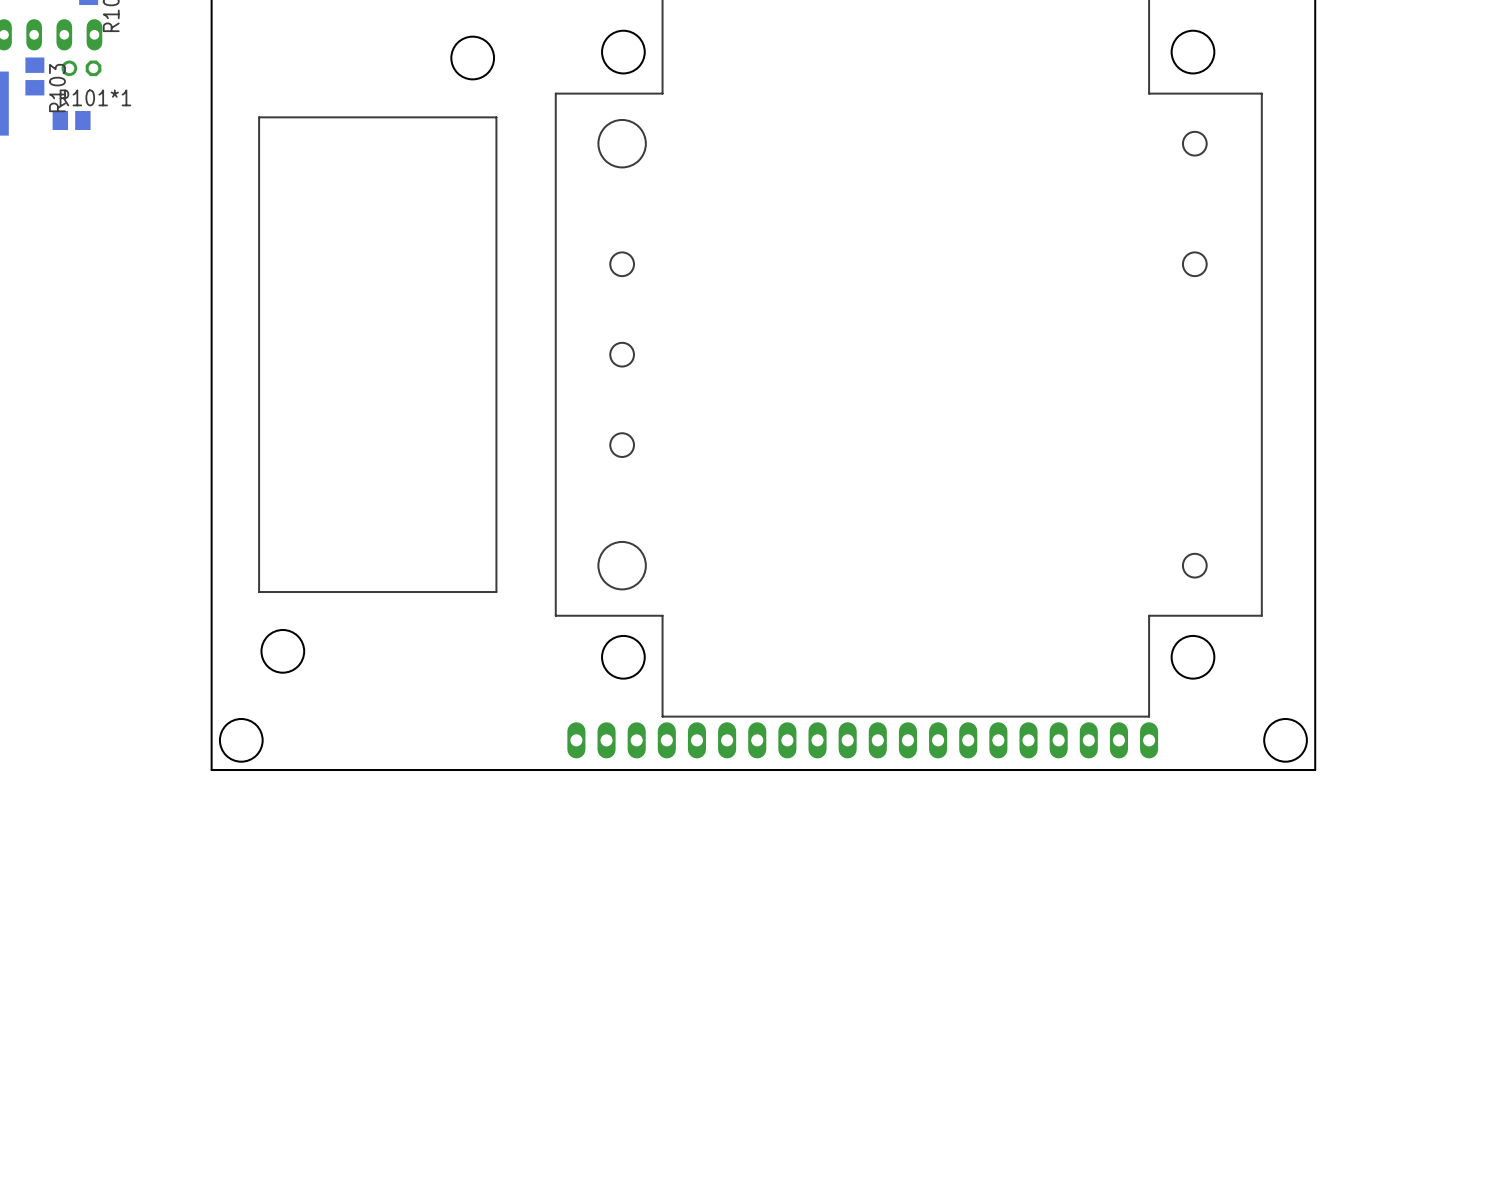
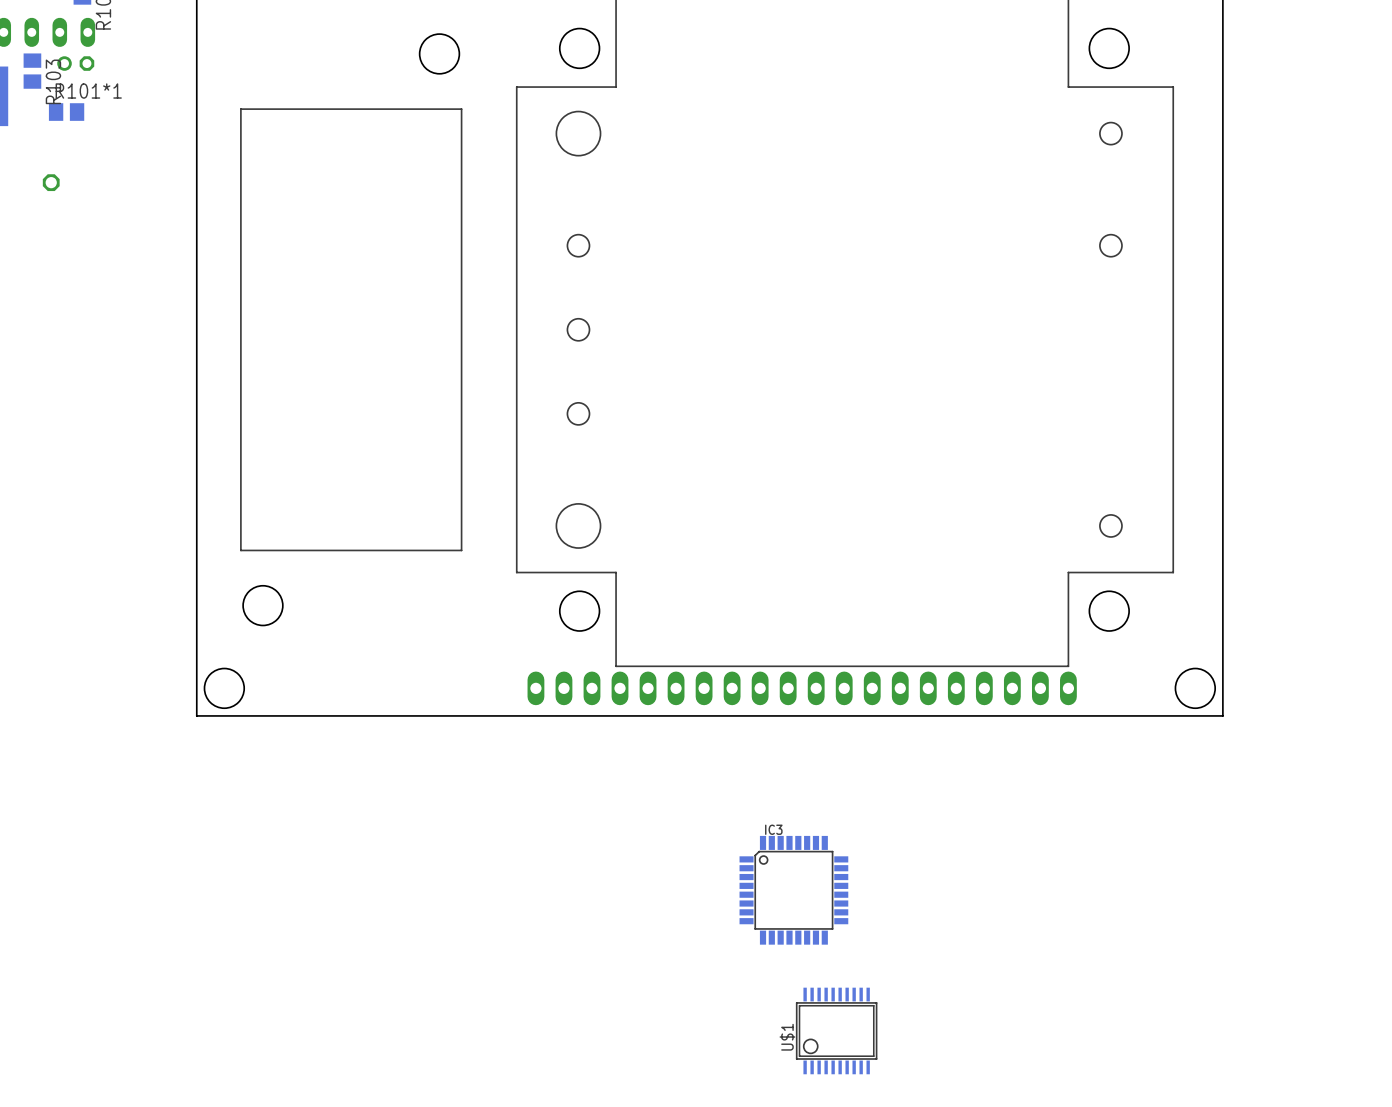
part: none -> (51, 182)
IC3: none -> (793, 890)
U$1: none -> (836, 1030)

